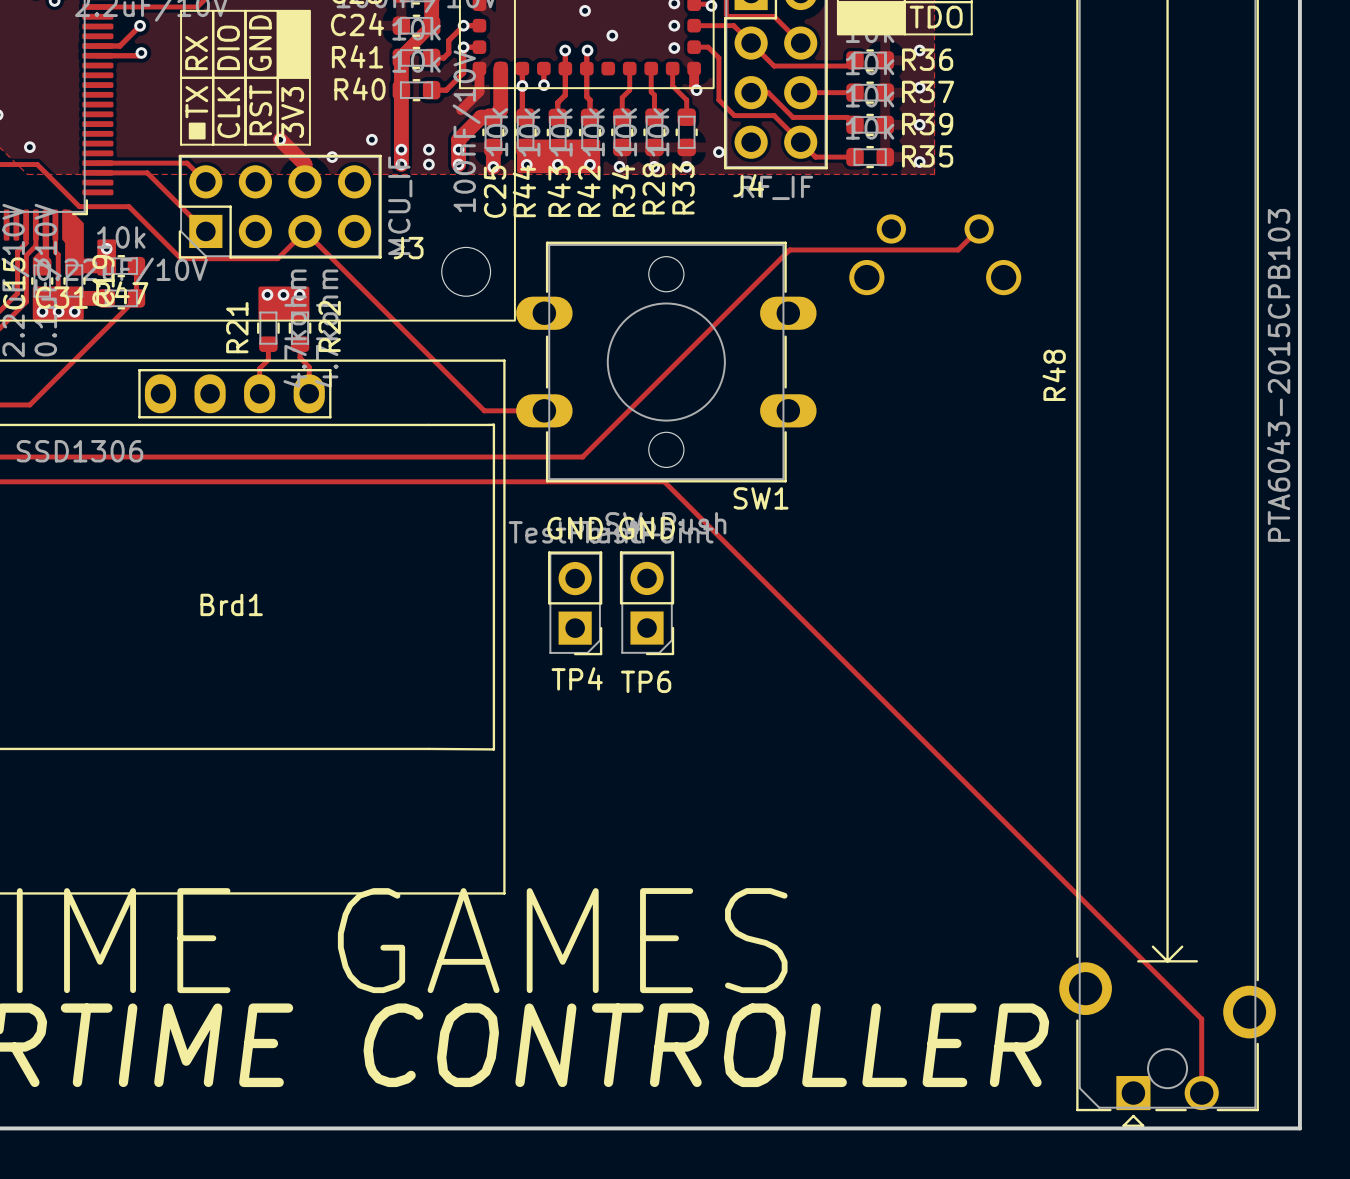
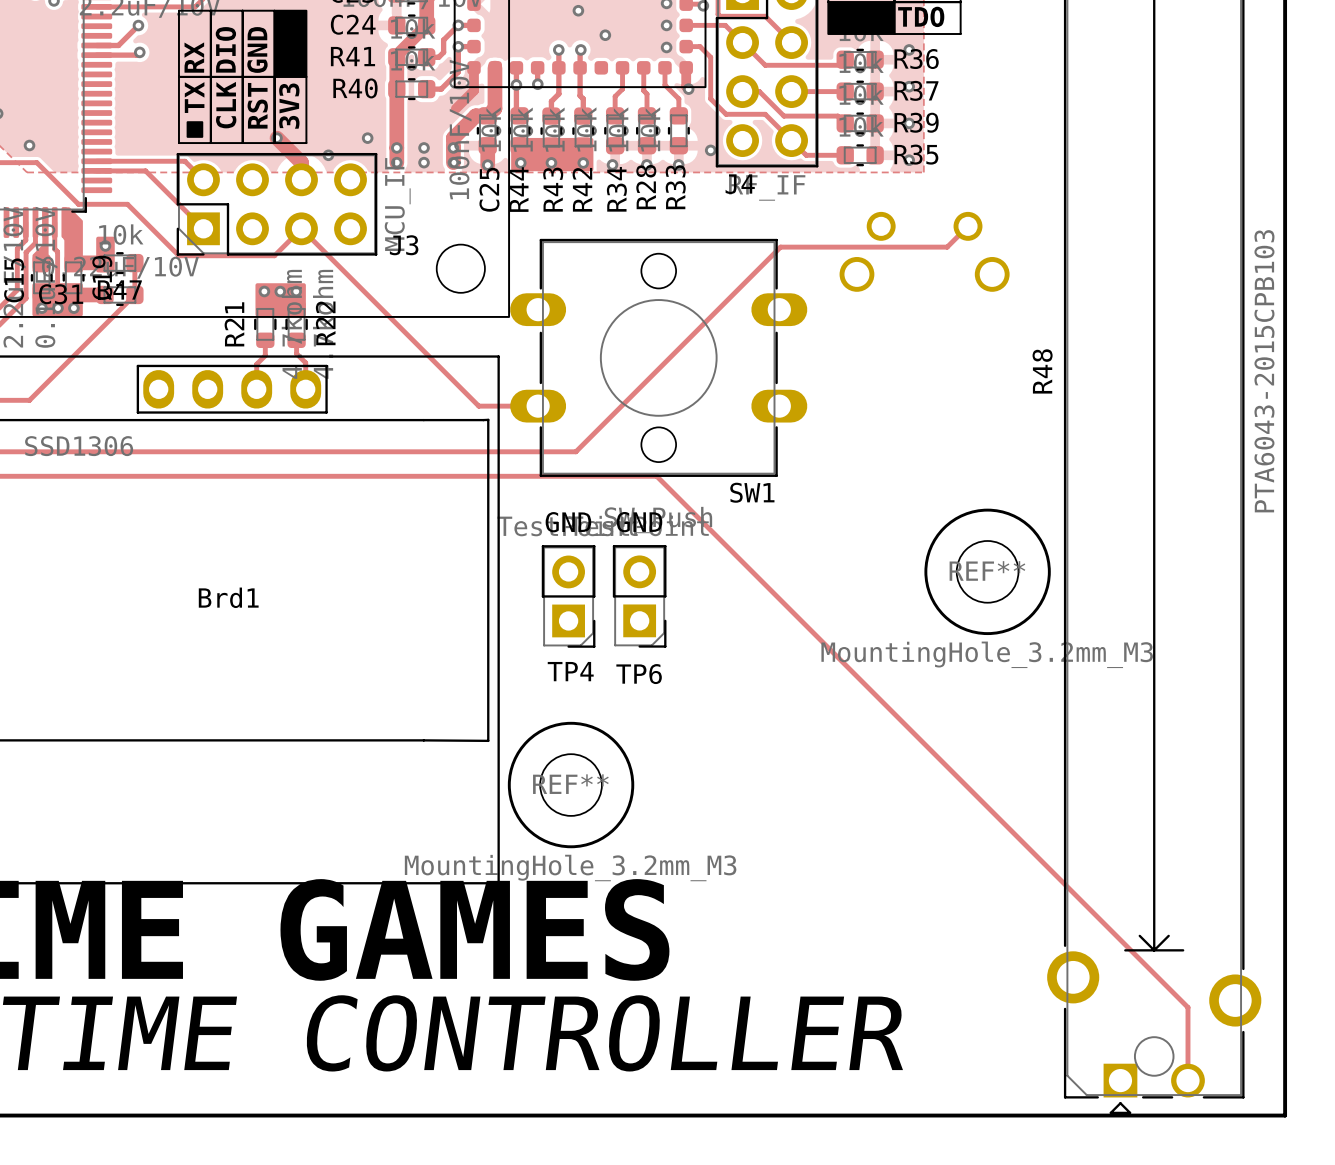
REF**: none -> MountingHole_3.2mm_M3 (987, 571)
REF**: none -> MountingHole_3.2mm_M3 (571, 785)

